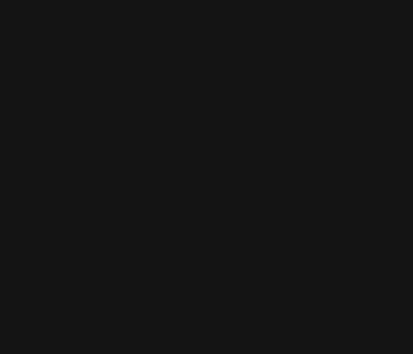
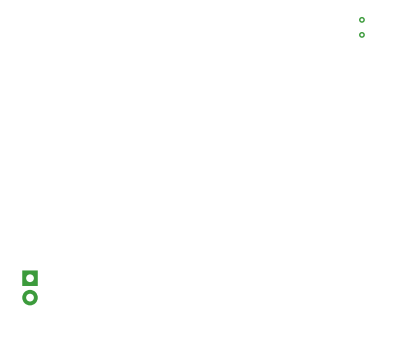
via: none -> (361, 19)
via: none -> (361, 34)
part: none -> (30, 287)

